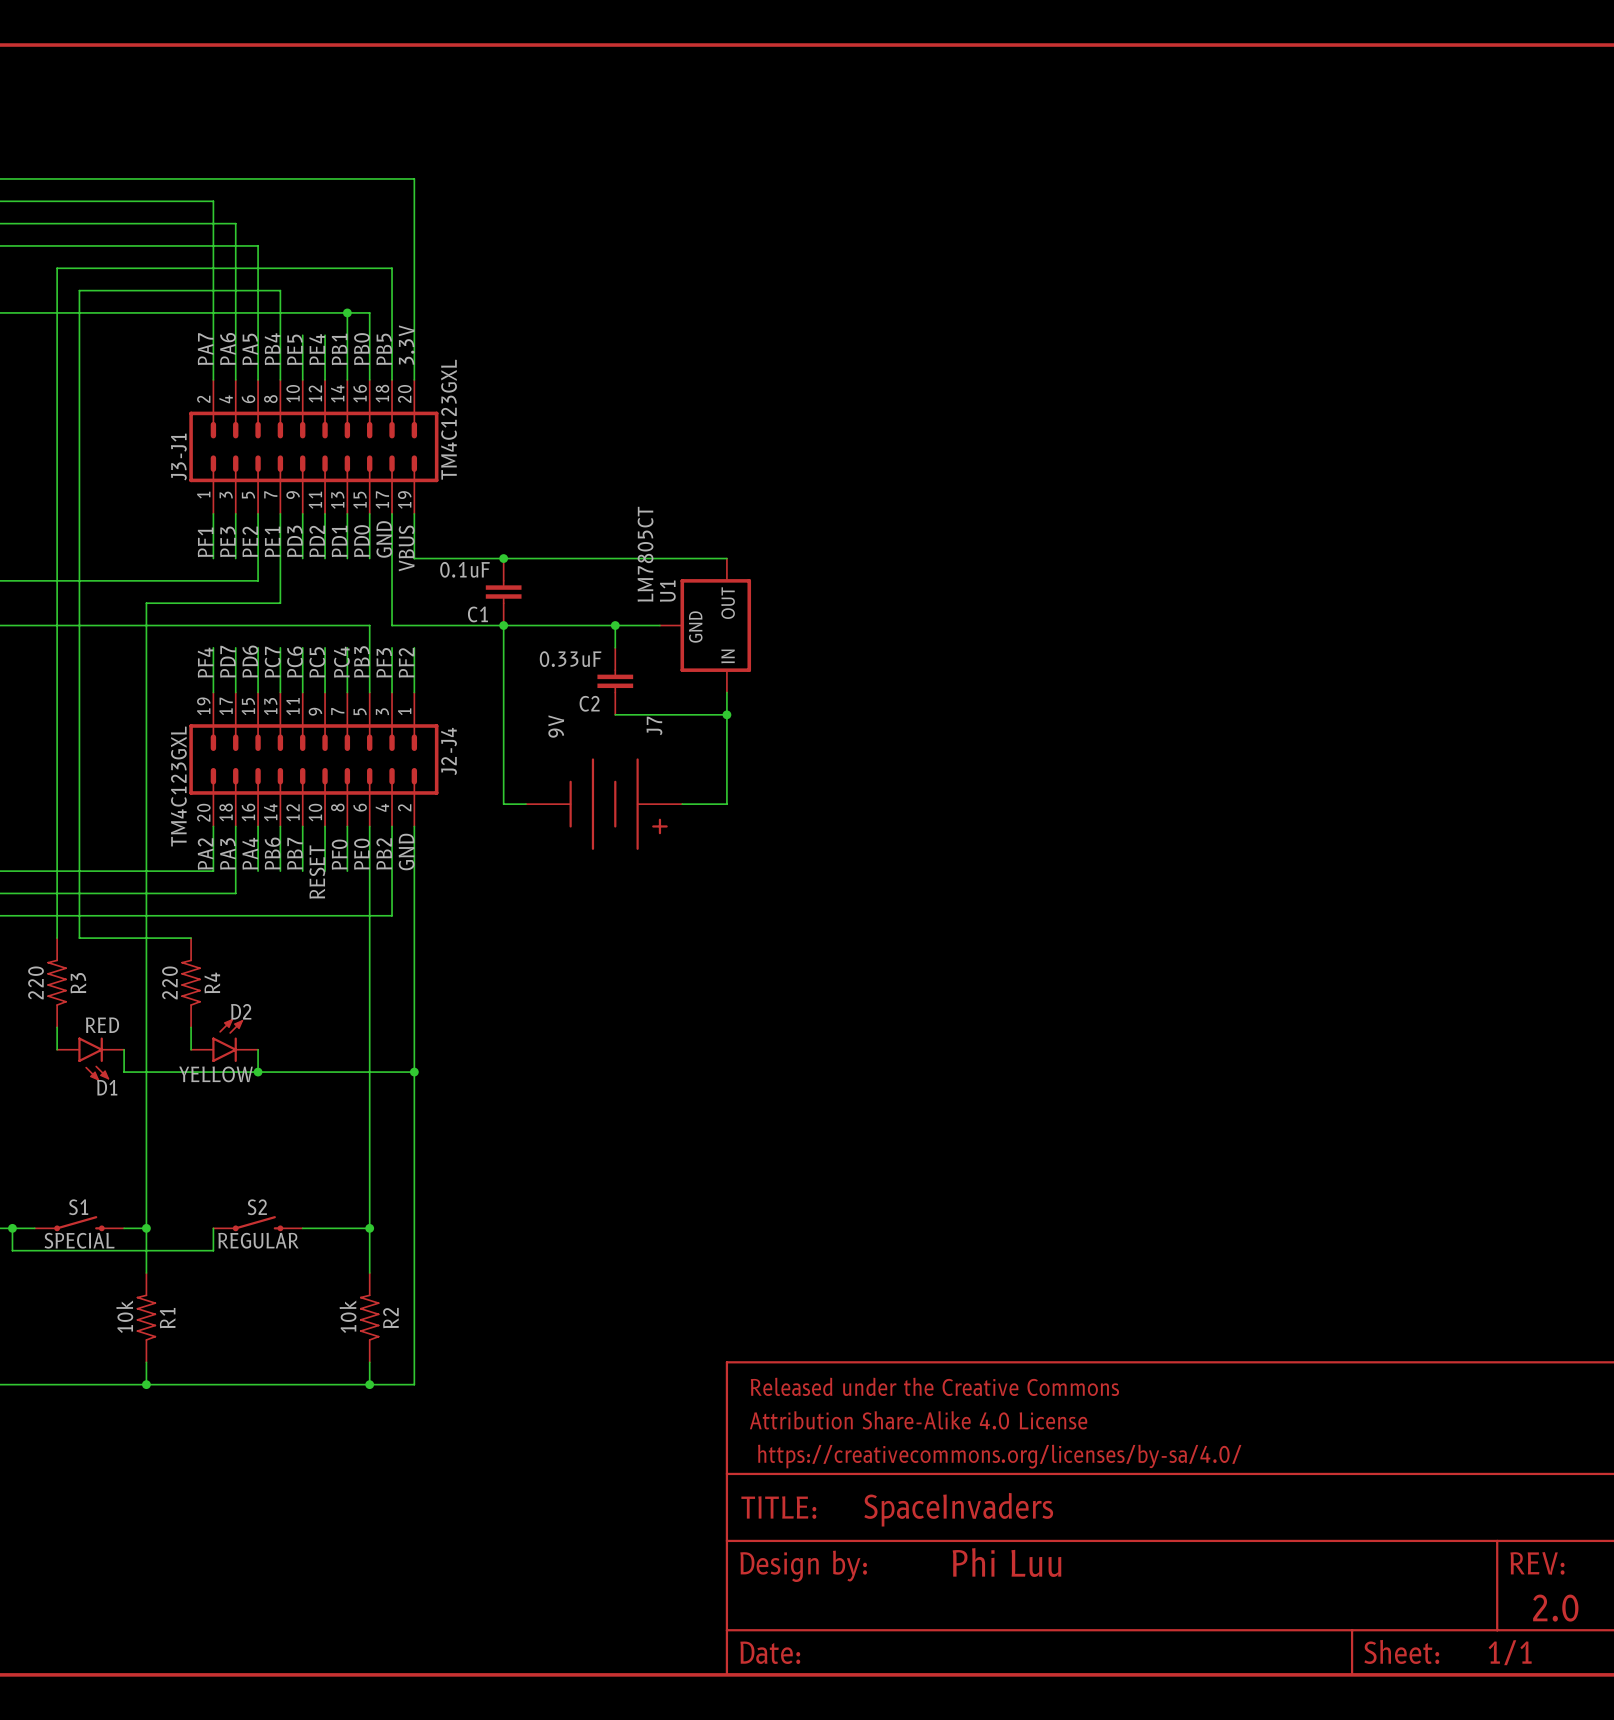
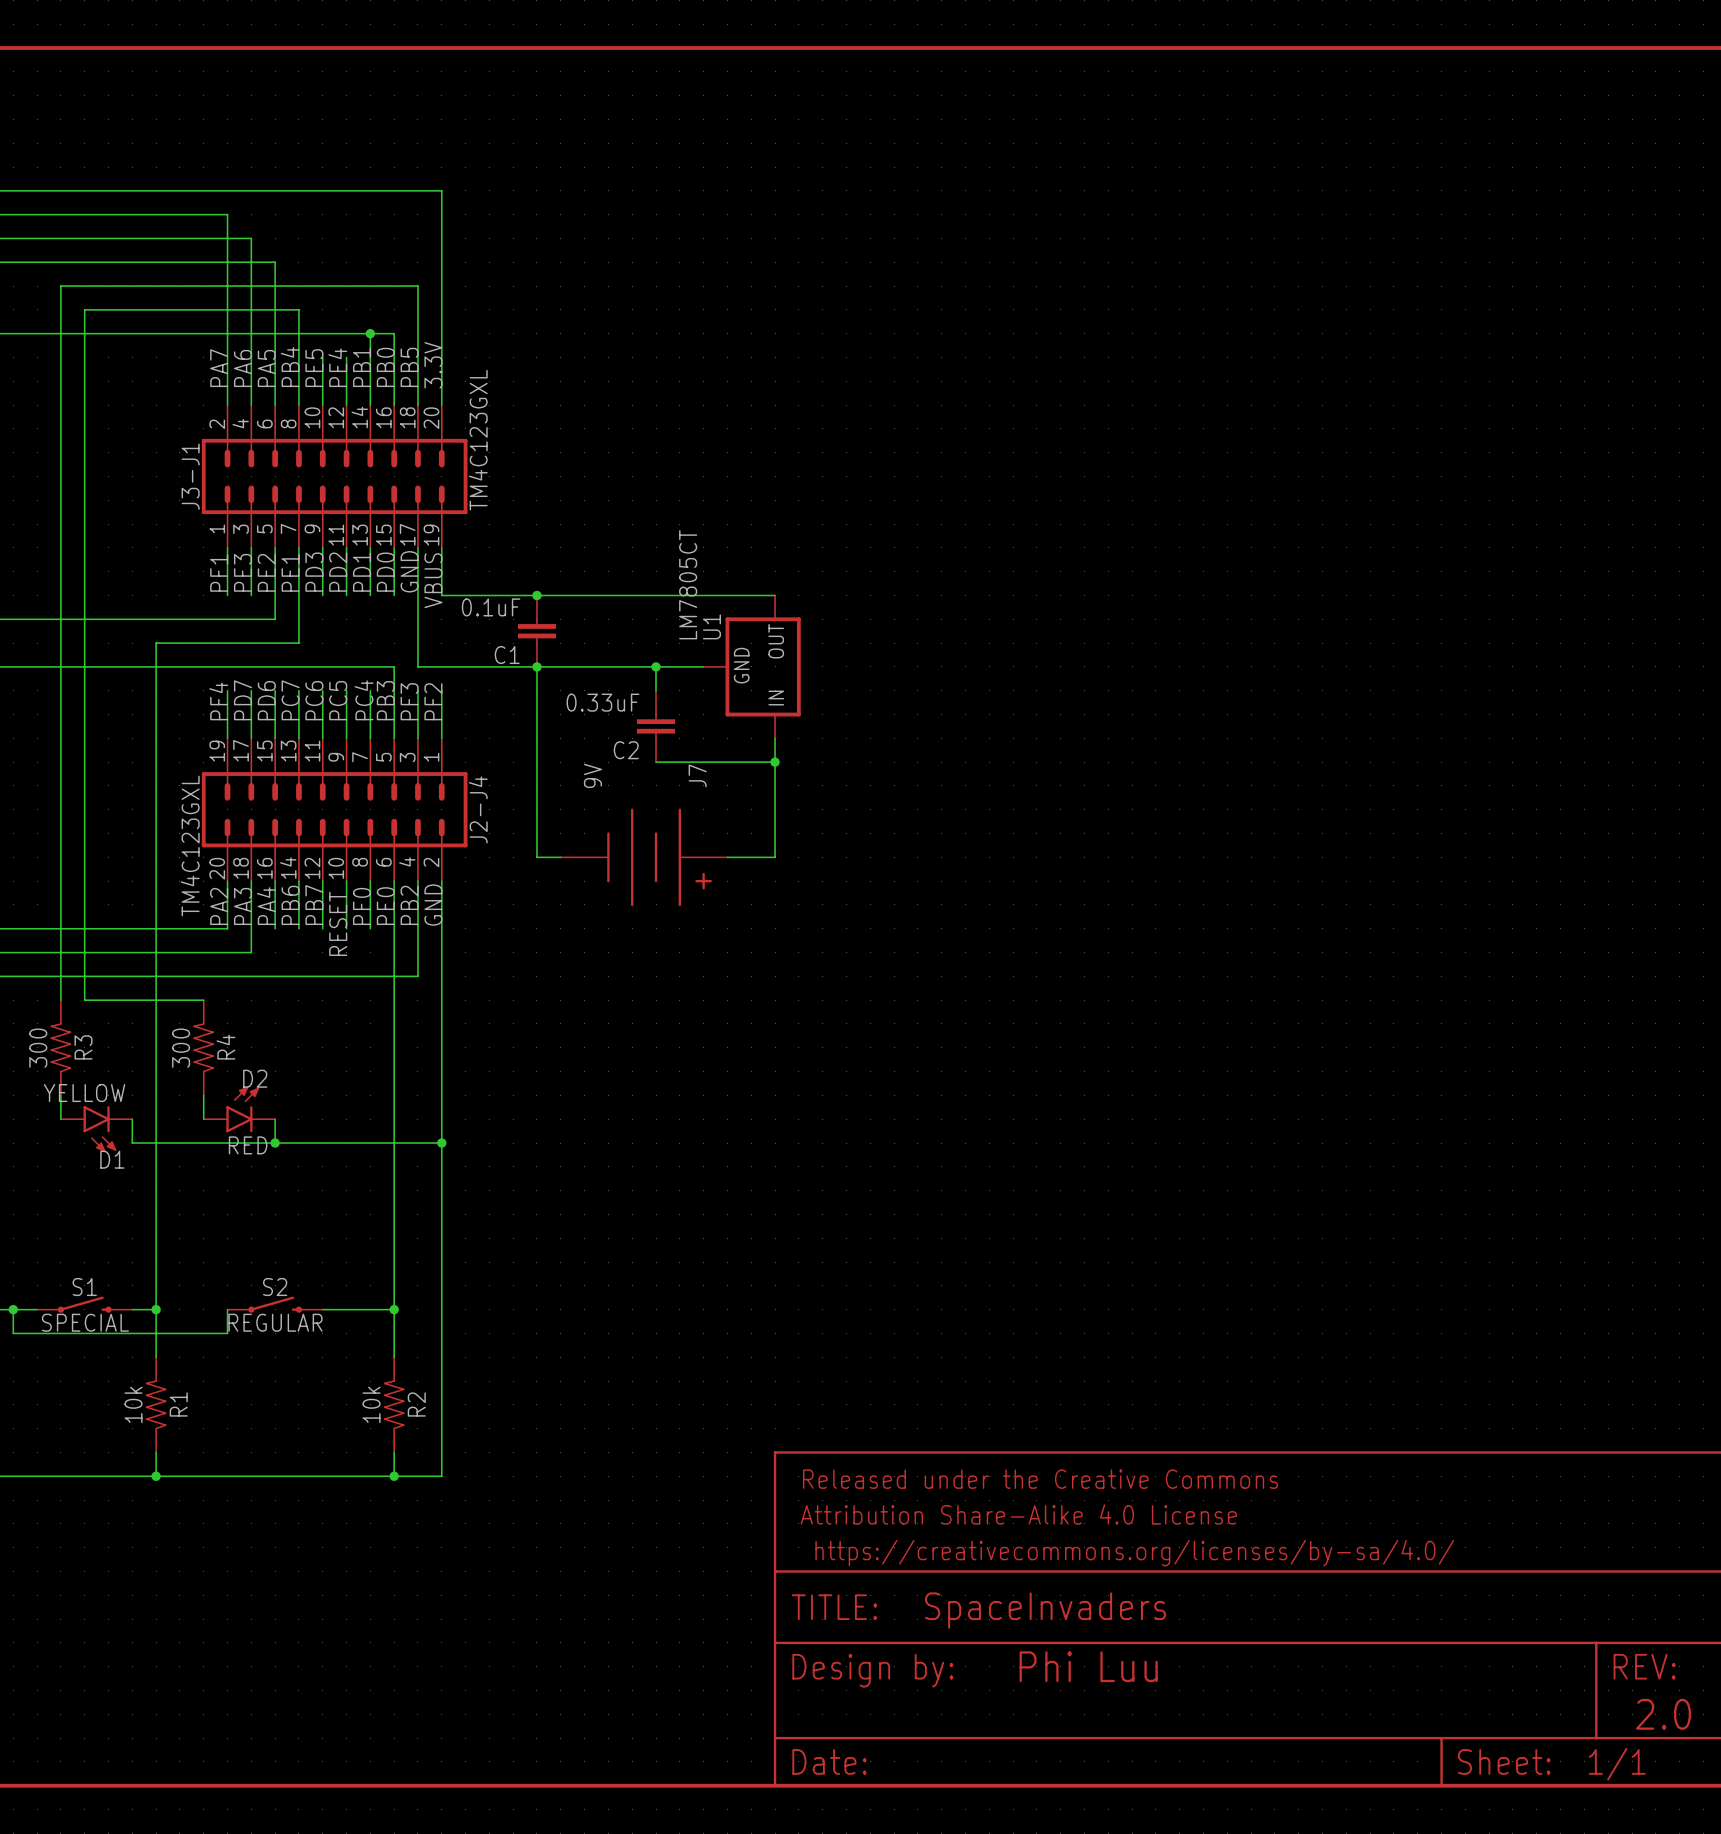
R3 value: 220 (36, 982) -> 300 (38, 1048)
R4 value: 220 (169, 982) -> 300 (181, 1048)
D1 value: RED (102, 1025) -> YELLOW (84, 1093)
D2 value: YELLOW (215, 1074) -> RED (248, 1145)

